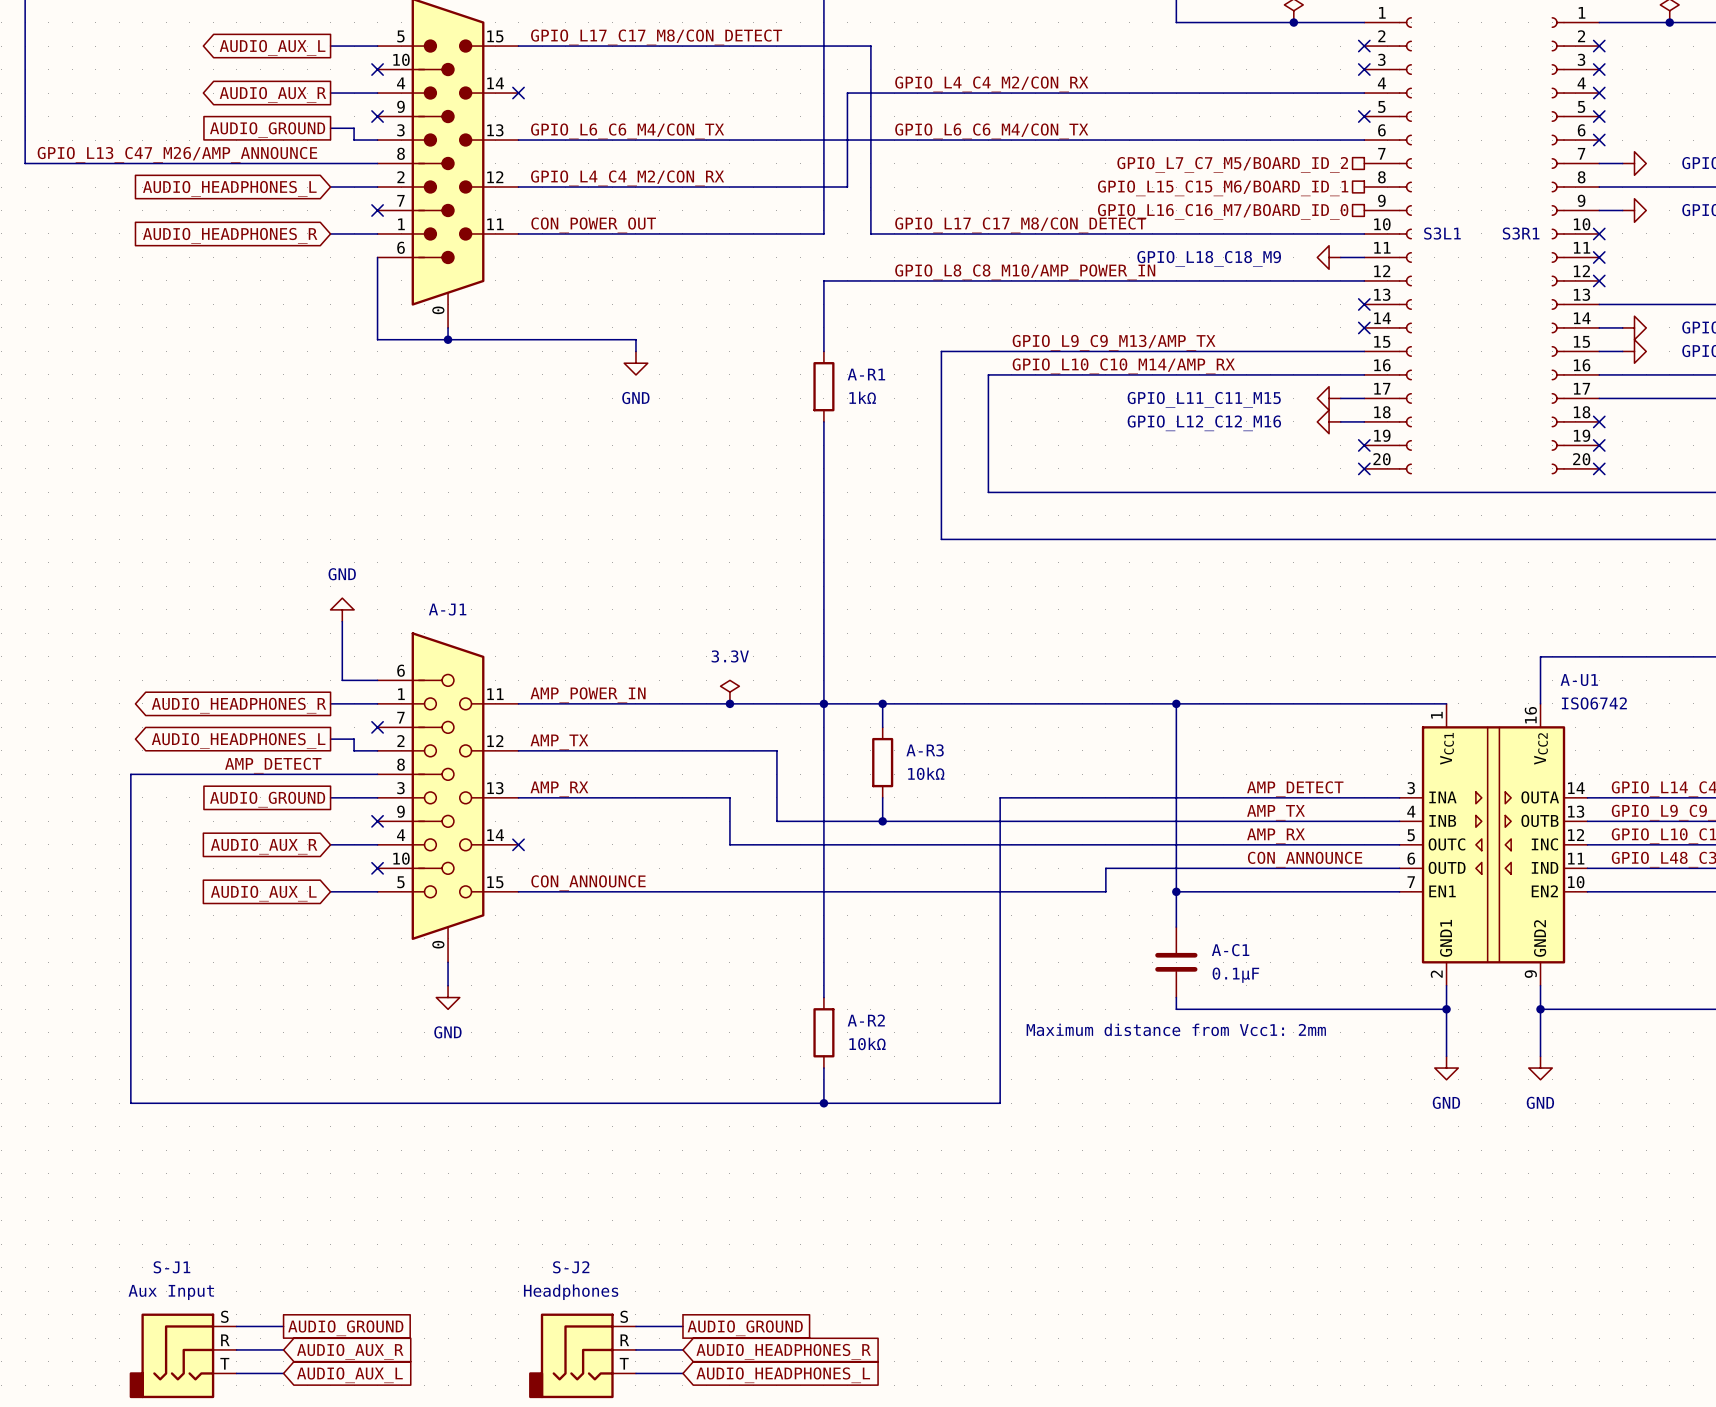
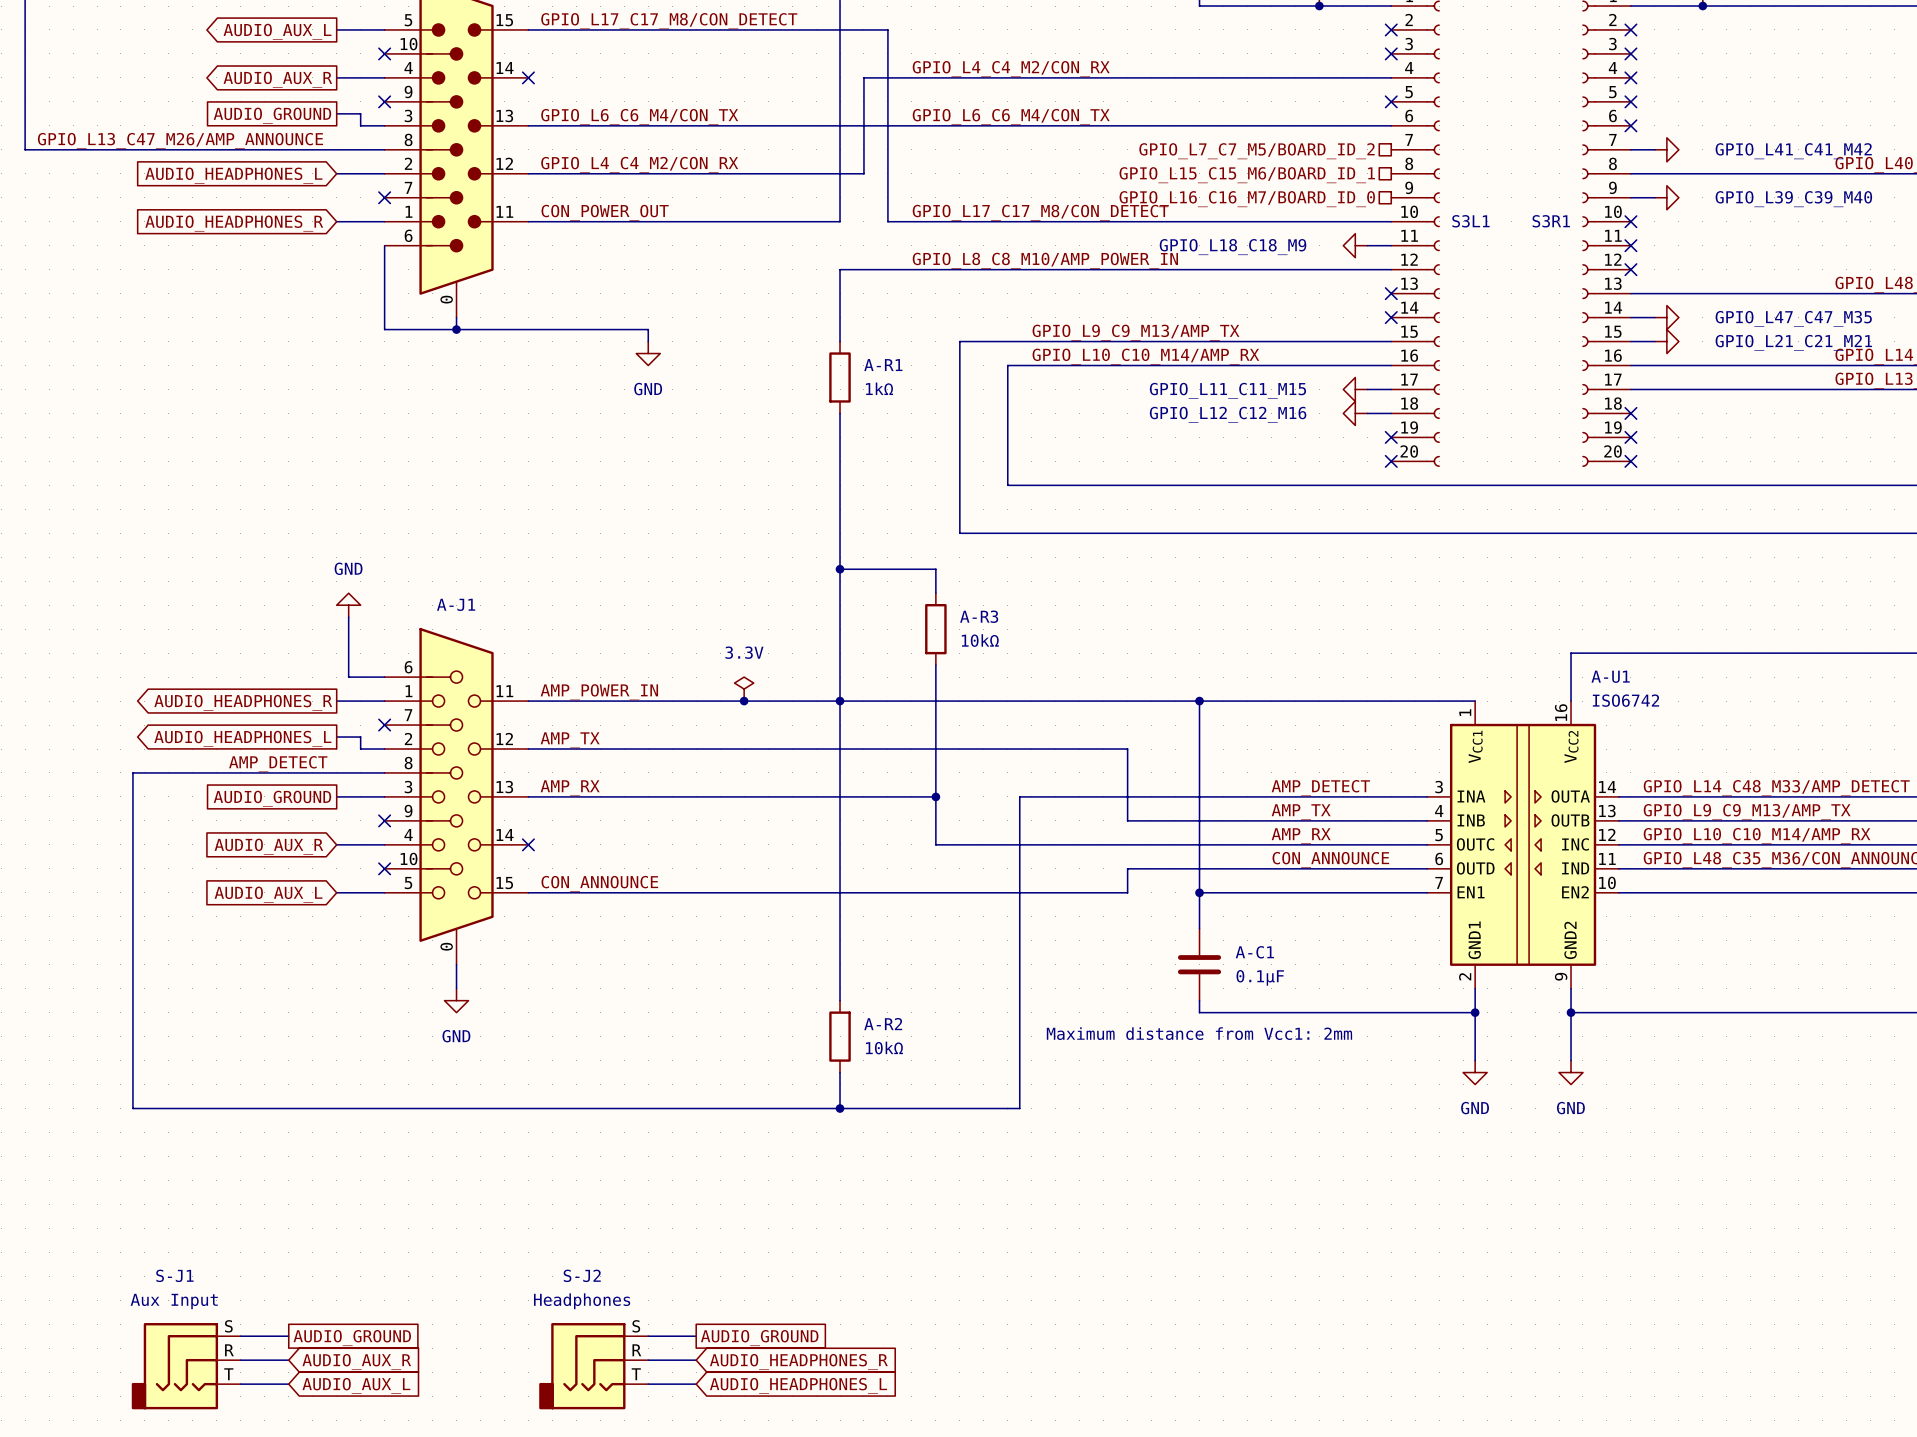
wire: none -> (840, 569) (935, 569) (935, 593)
junction: none -> (840, 569)
wire: none -> (935, 665) (935, 844)
wire: (882, 703) (882, 727) -> none
junction: (882, 703) -> none
wire: (776, 750) (776, 821) (1105, 821) -> (792, 749) (1127, 749) (1127, 820)
A-R3 position: (882, 762) -> (935, 629)
wire: (729, 797) (729, 844) (917, 844) -> (744, 796) (935, 796)
wire: (882, 797) (882, 821) -> none
junction position: (882, 821) -> (935, 796)

